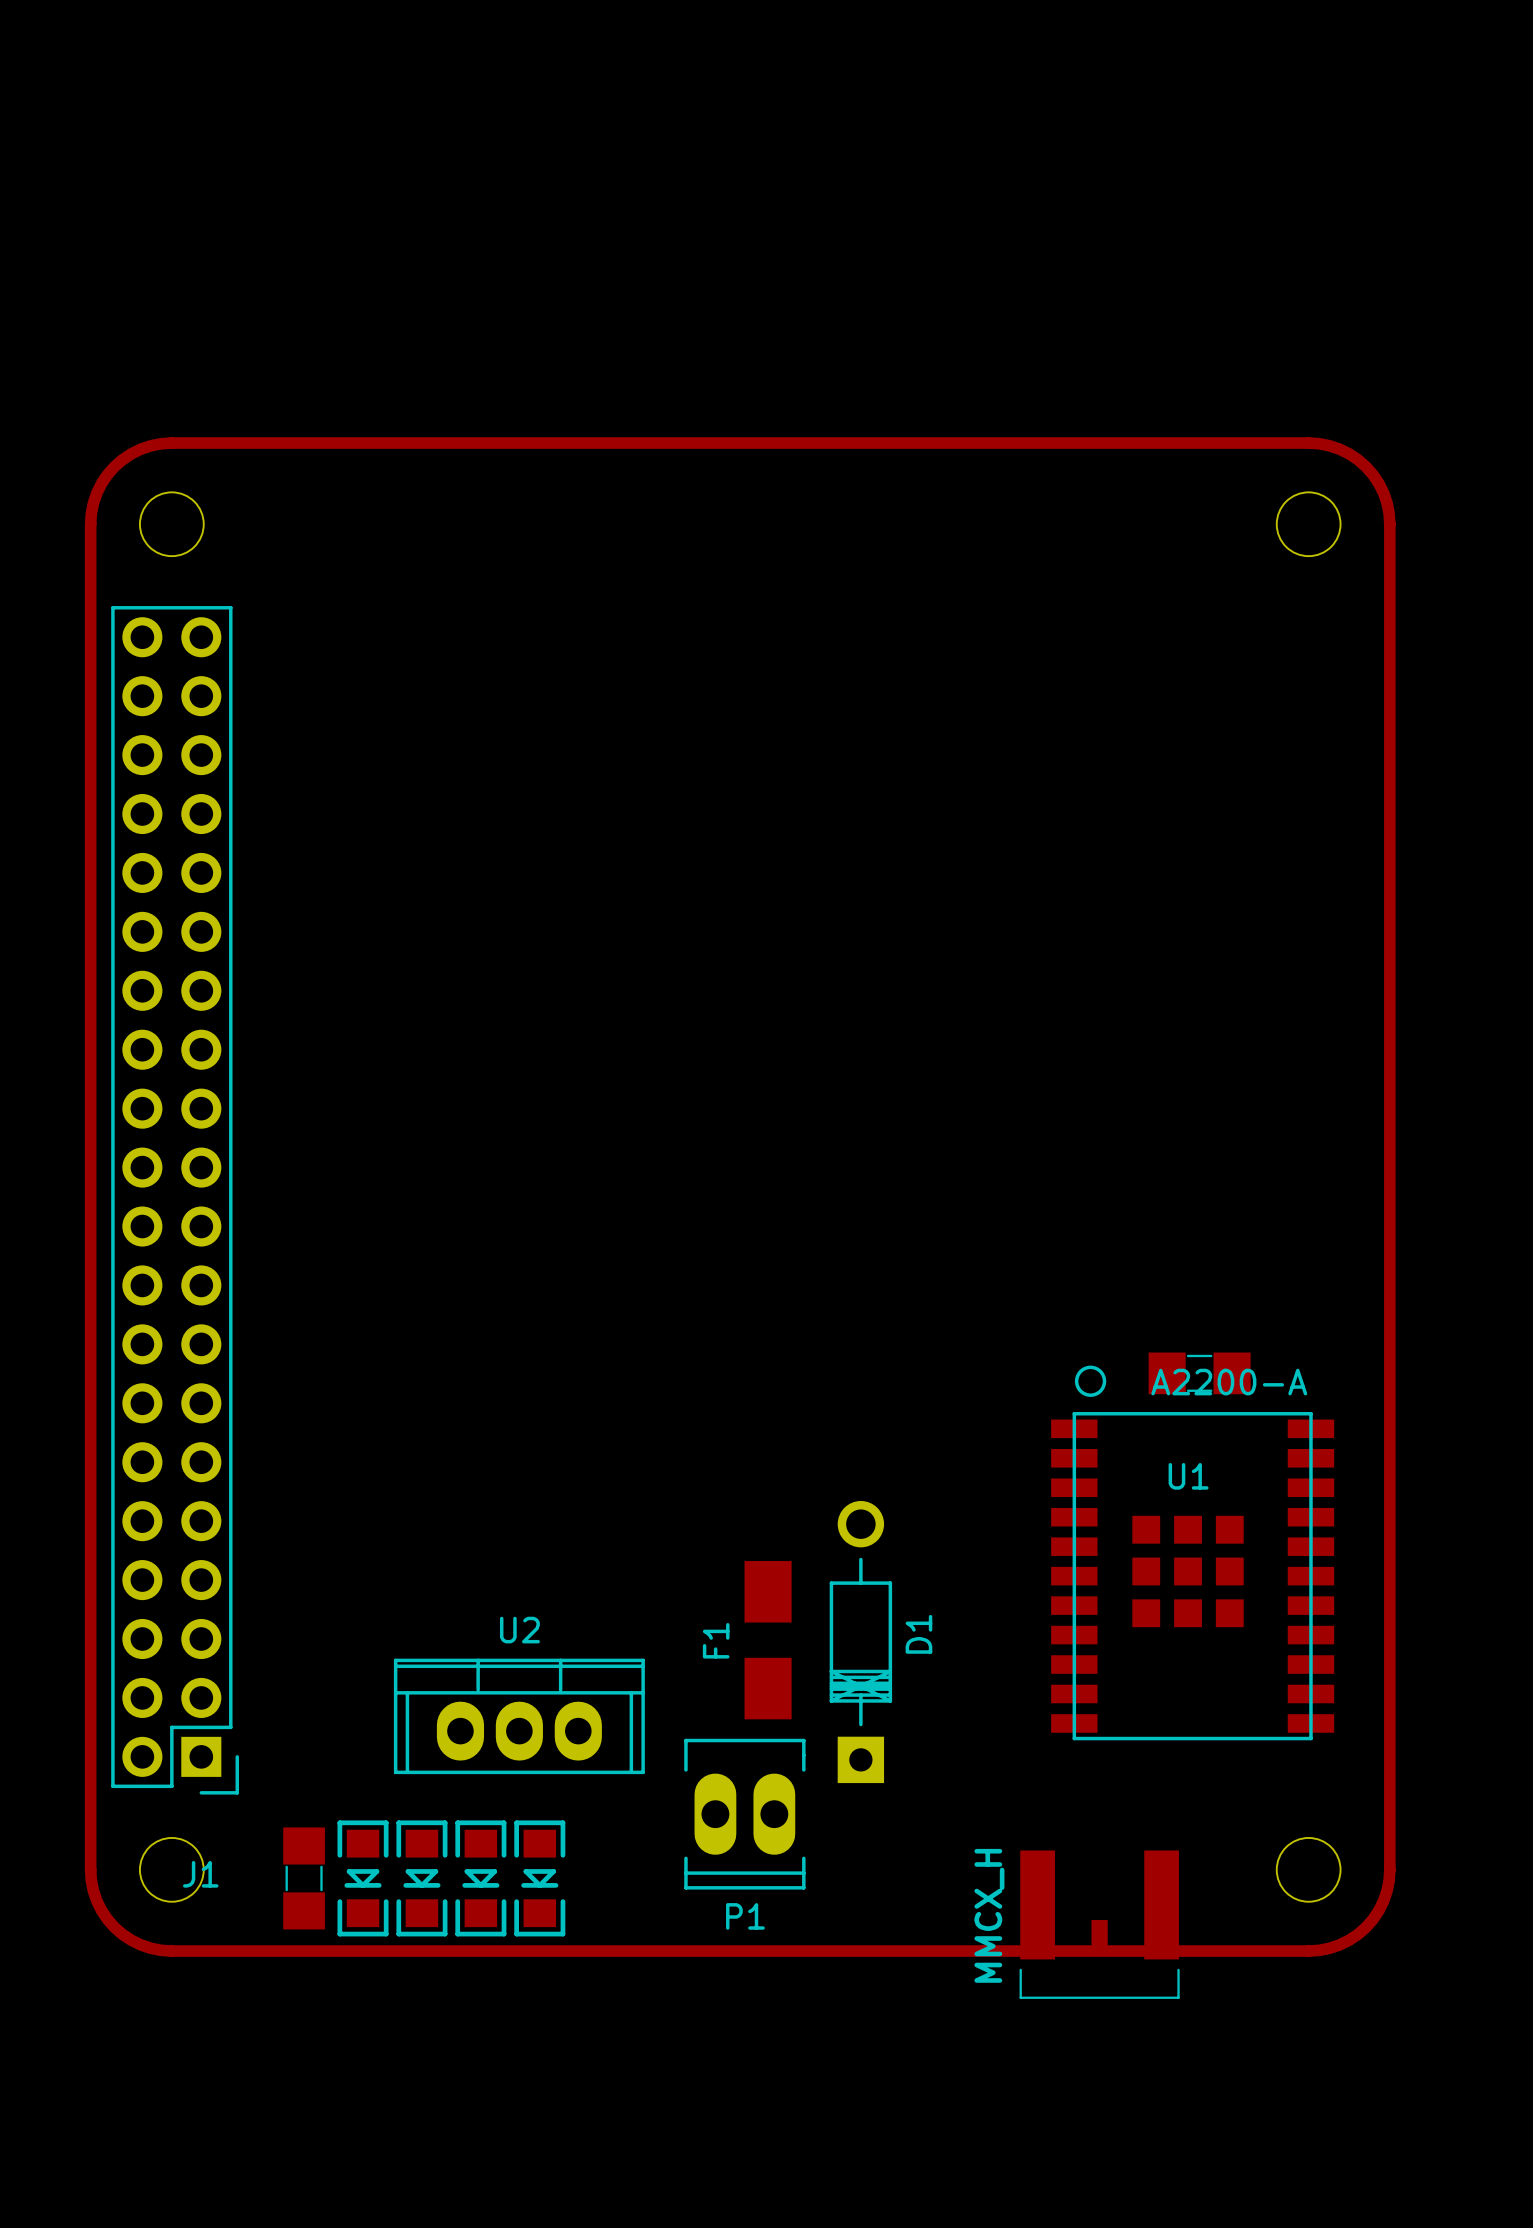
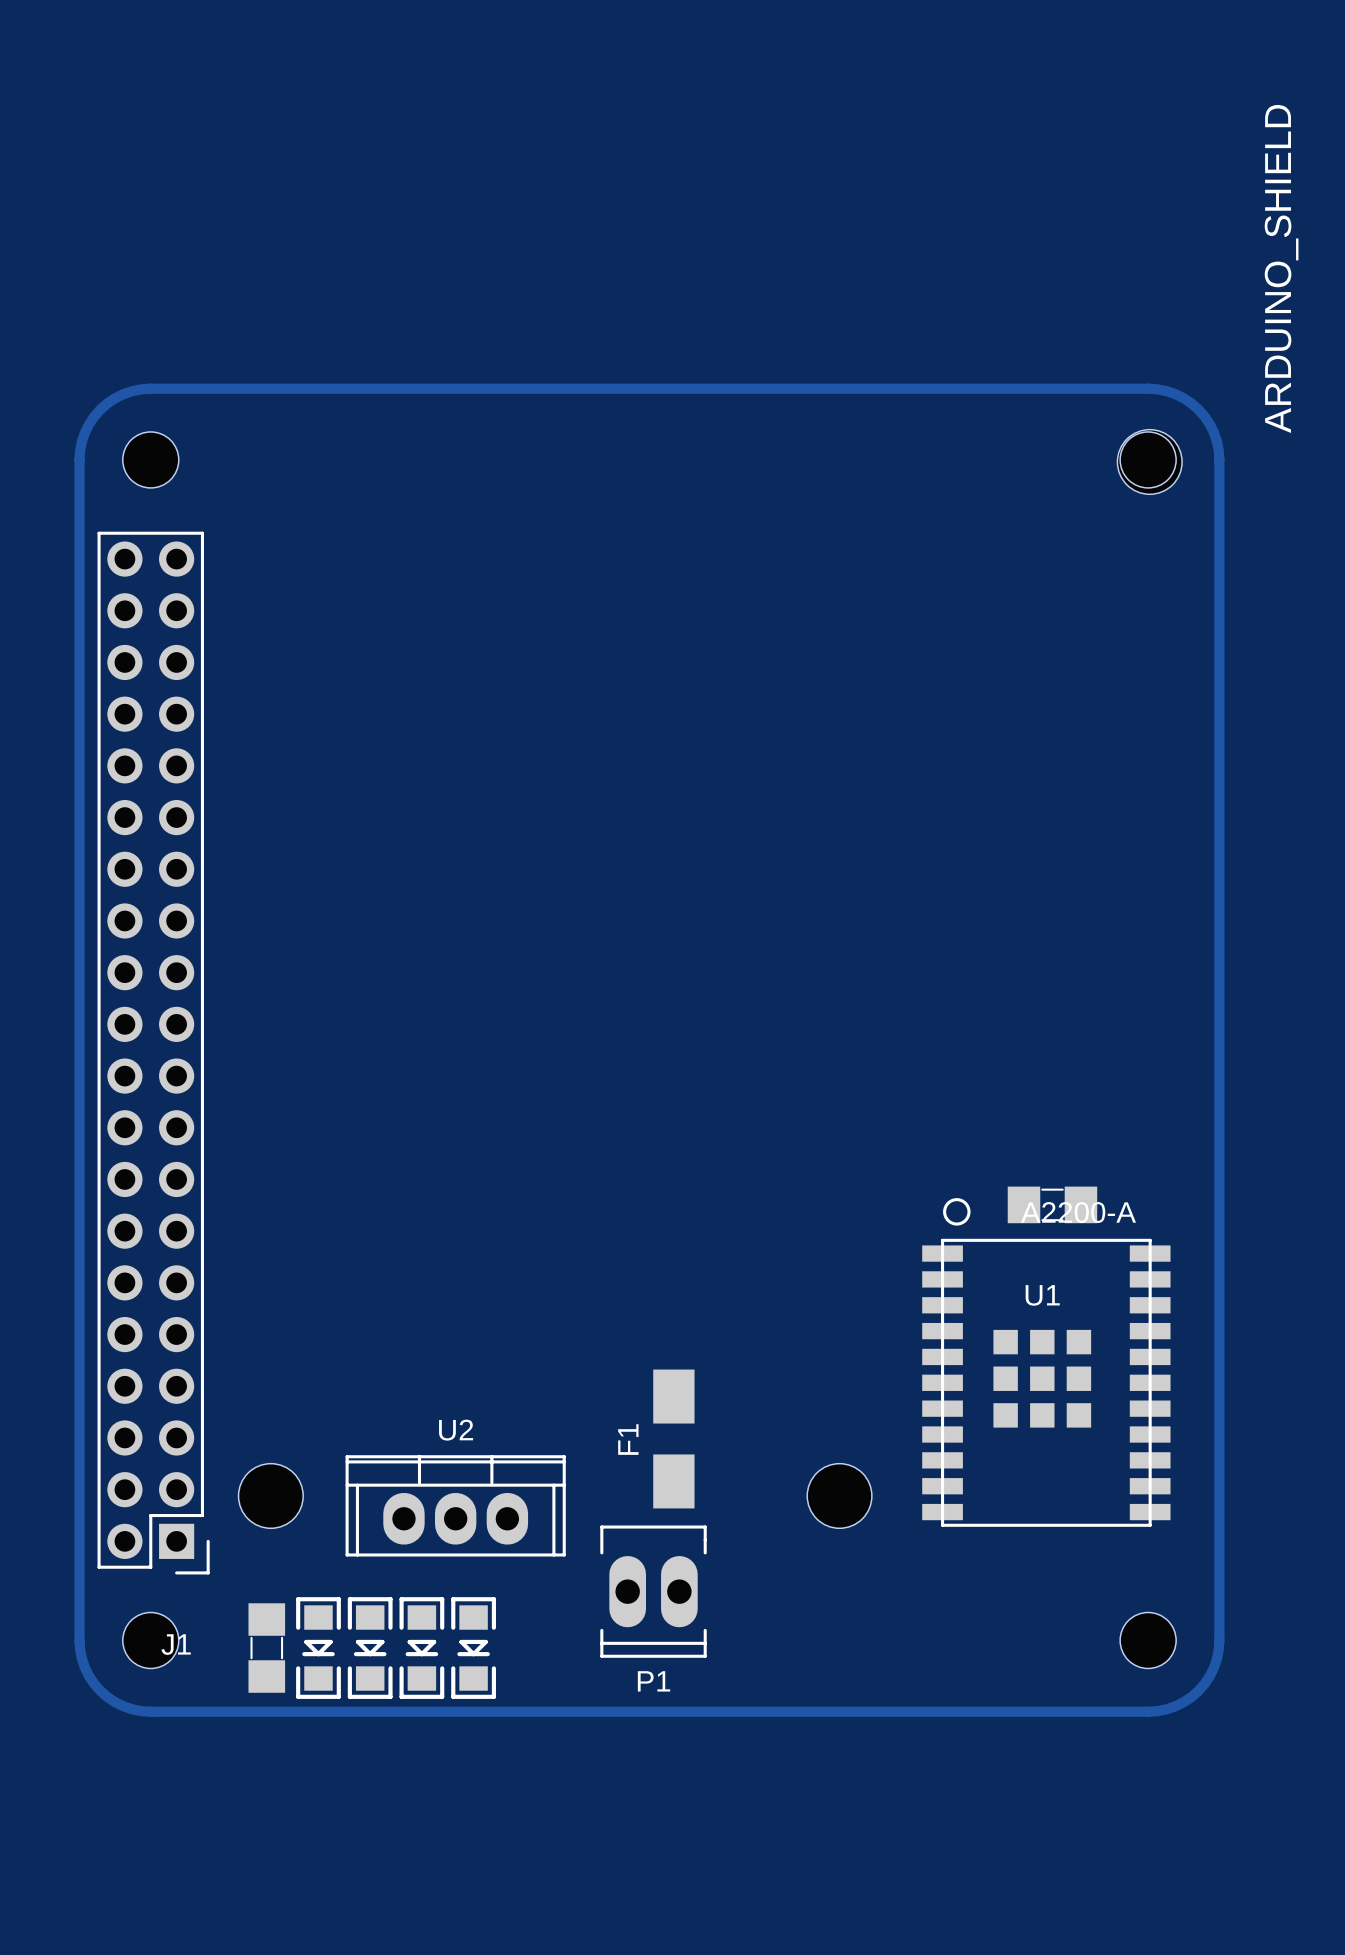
ARDUINO_SHIELD: none -> (710, 978)
D1: (860, 1642) -> none
part: MMCX_H (1099, 1924) -> none

